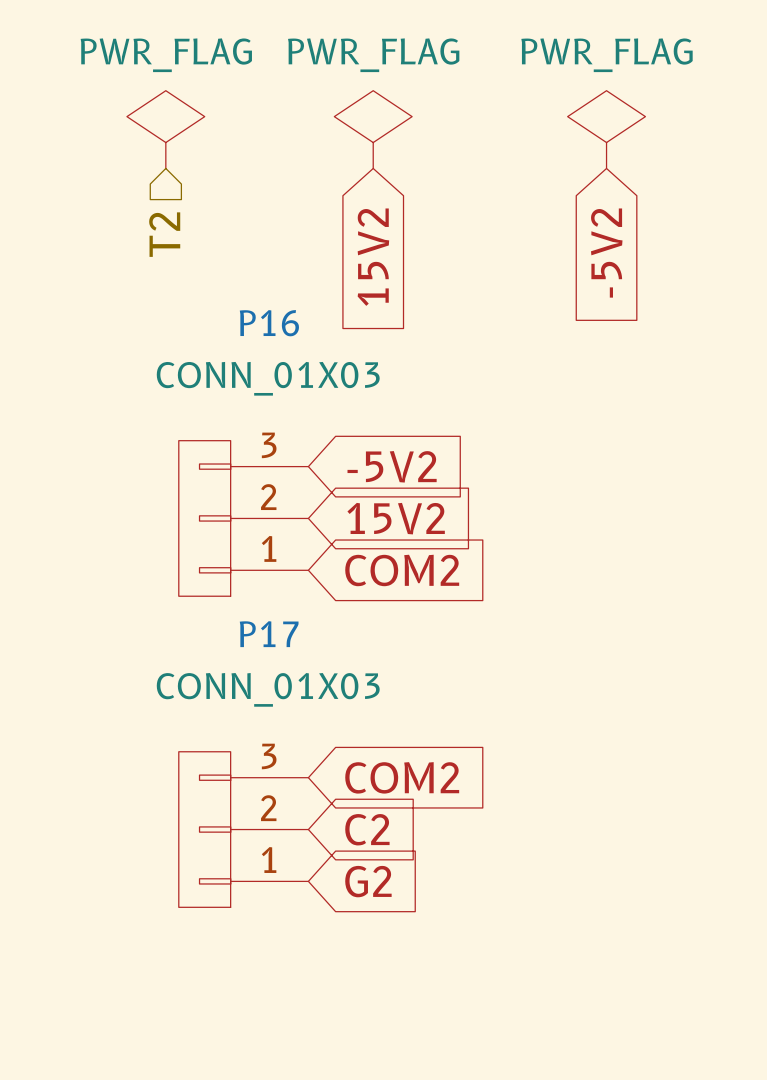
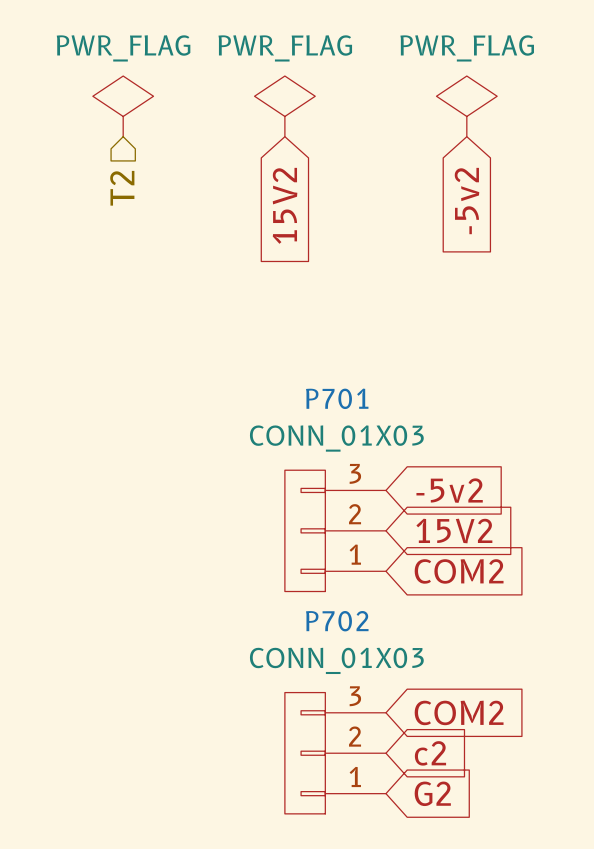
global label: -5V2 (606, 253) -> -5v2 (467, 201)
global label: -5V2 (392, 466) -> none
P16: CONN_01X03 (243, 518) -> none
global label position: 15V2 (396, 518) -> 15V2 (454, 531)
global label: COM2 (402, 570) -> none
global label: none -> -5v2 (449, 490)
P701: none -> CONN_01X03 (335, 530)
global label position: COM2 (402, 777) -> COM2 (459, 571)
P17: CONN_01X03 (243, 829) -> none
global label: C2 (367, 829) -> none
global label position: G2 (368, 881) -> G2 (432, 793)
global label: none -> COM2 (459, 712)
P702: none -> CONN_01X03 (335, 753)
global label: none -> c2 (430, 753)

